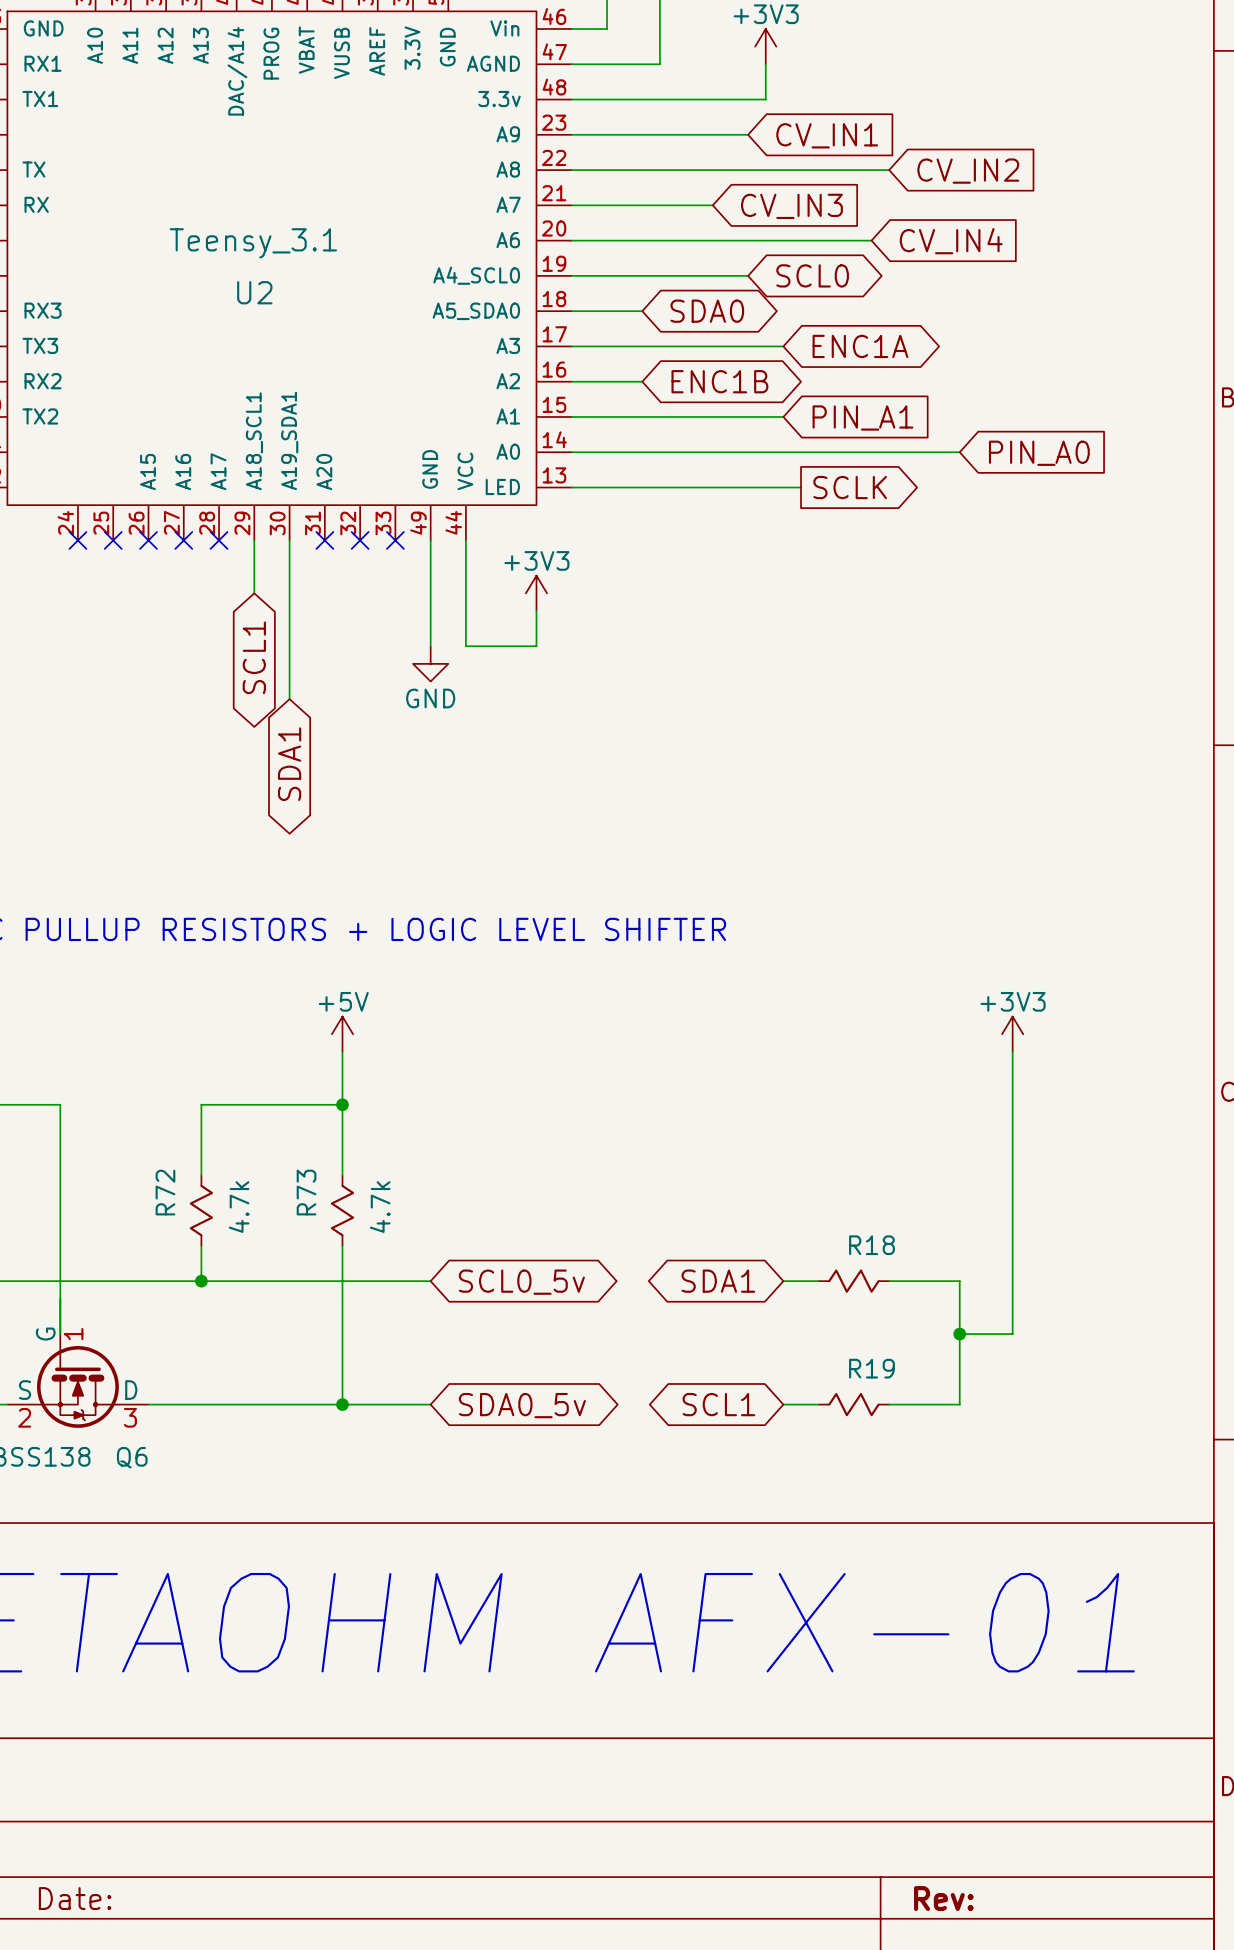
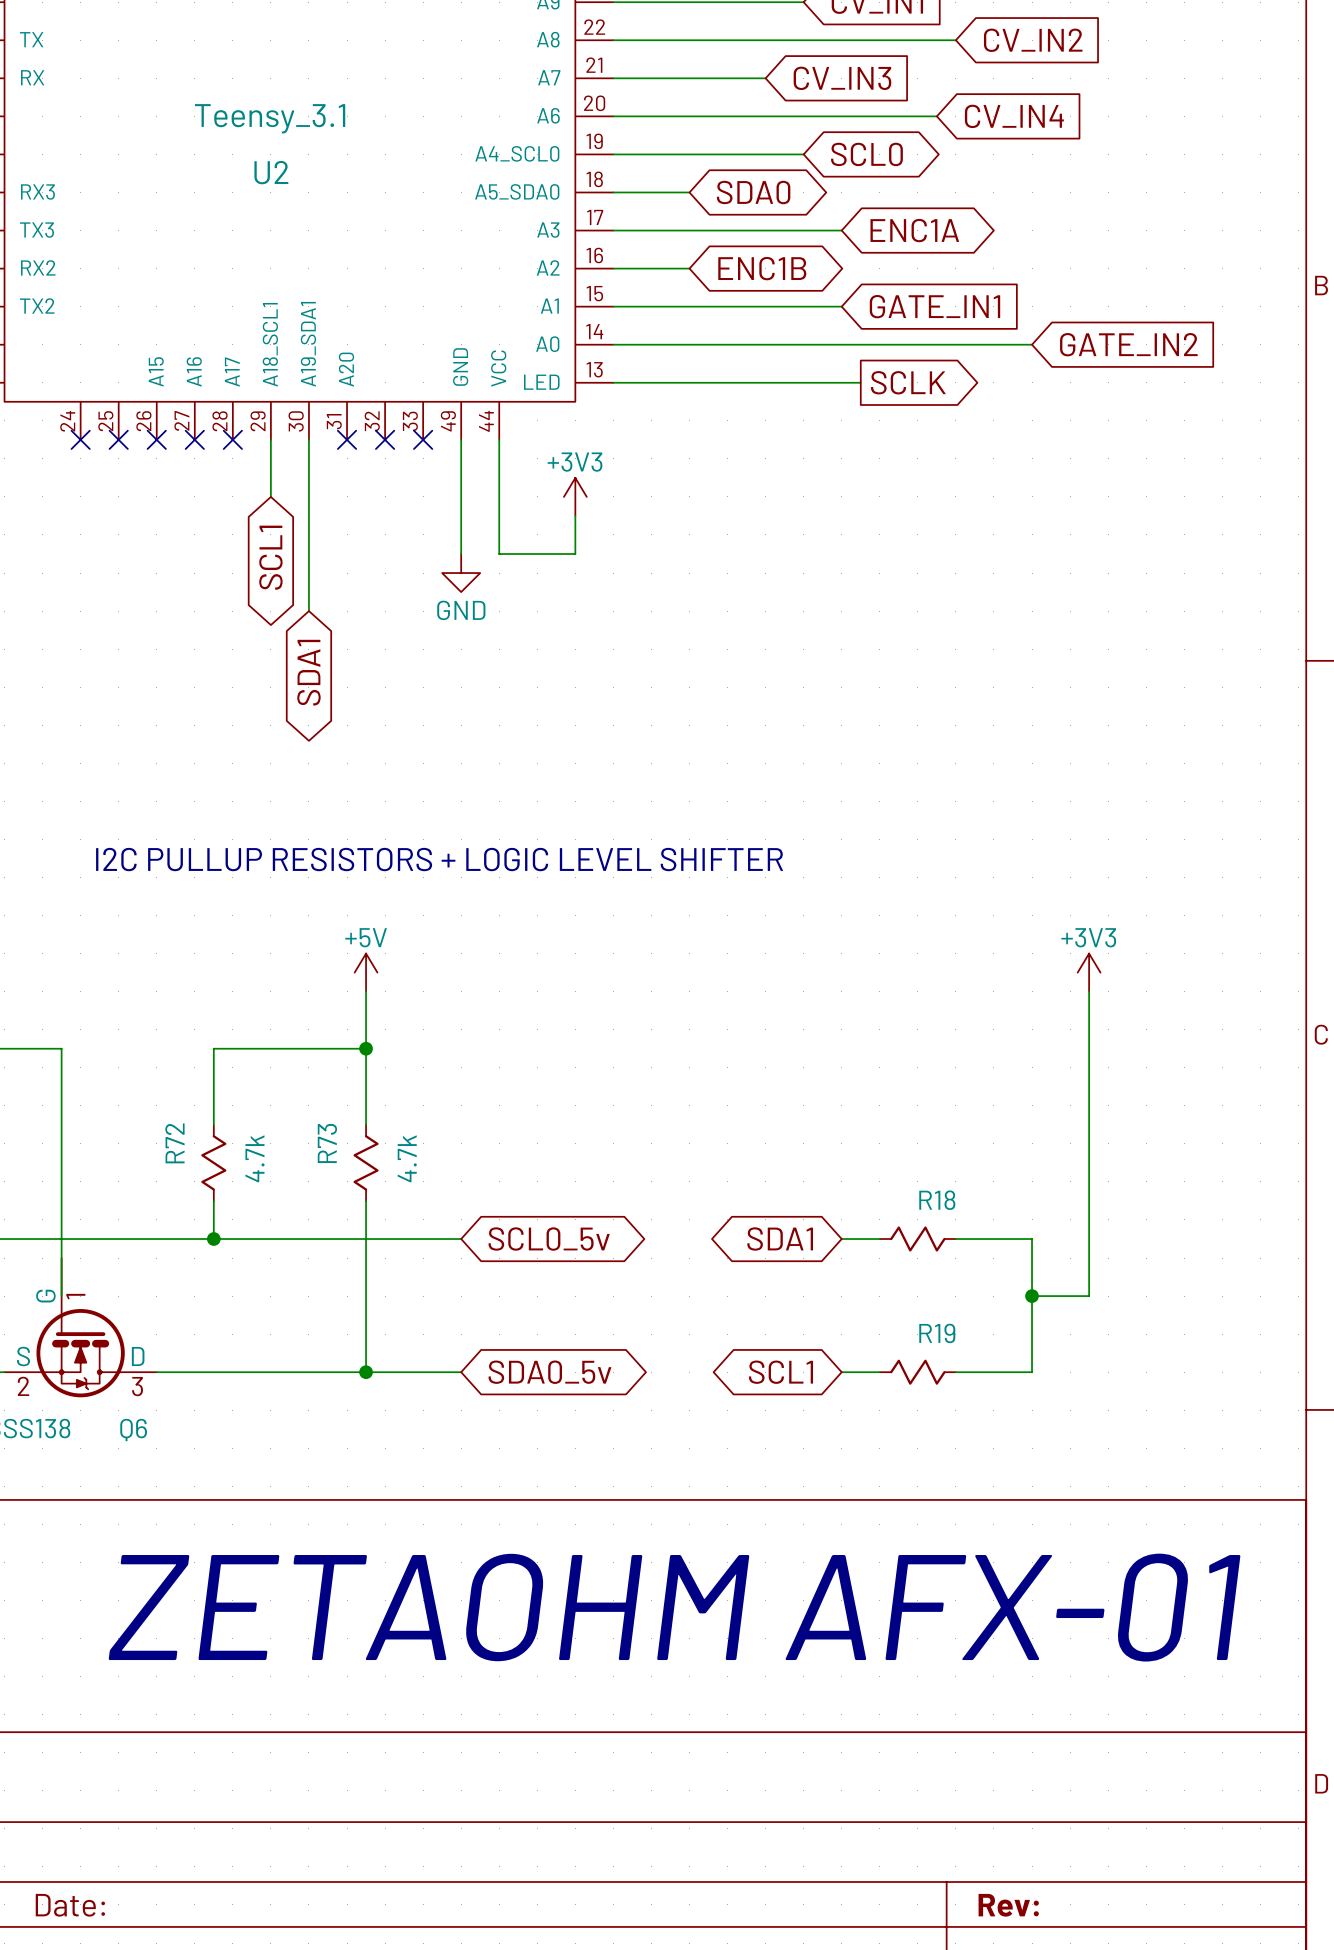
global label: PIN_A1 (863, 417) -> GATE_IN1 (934, 306)
global label: PIN_A0 (1039, 453) -> GATE_IN2 (1128, 344)

